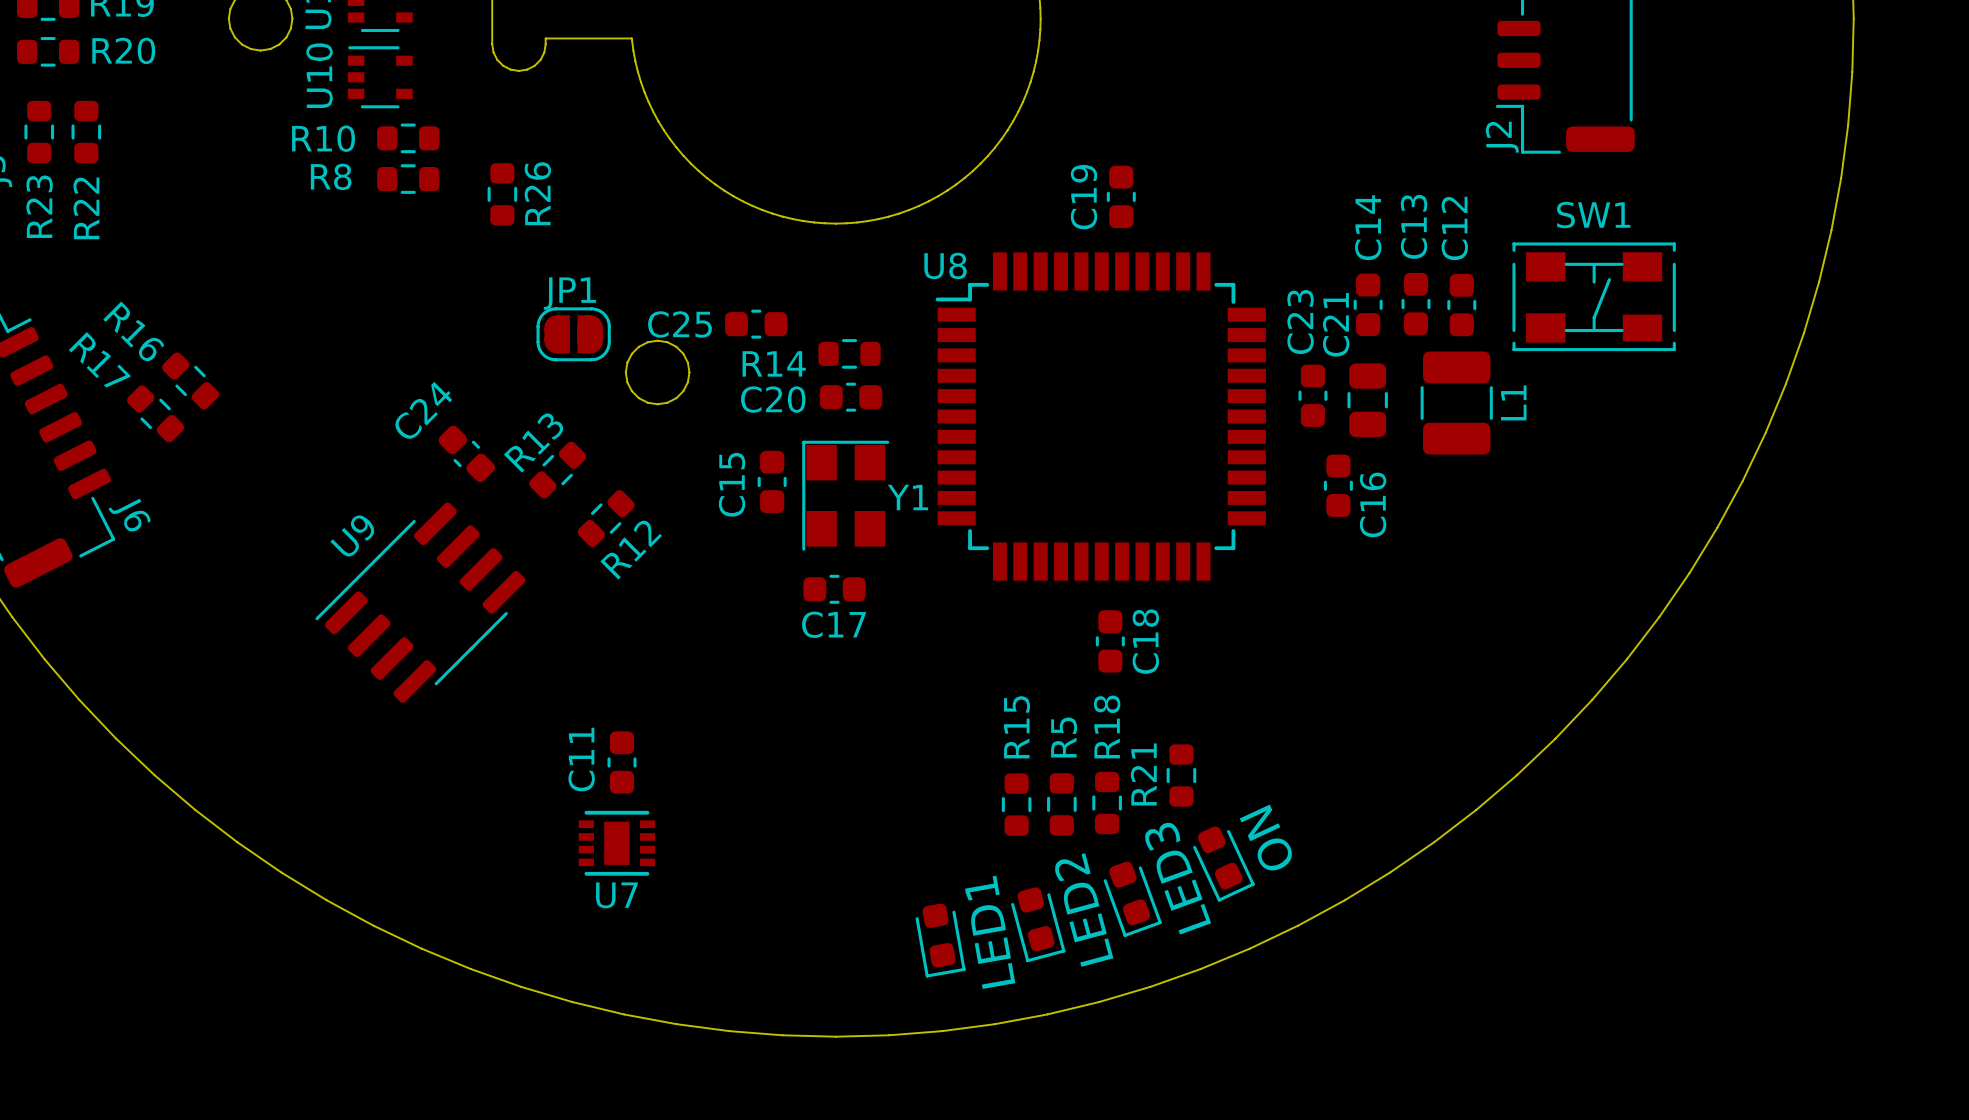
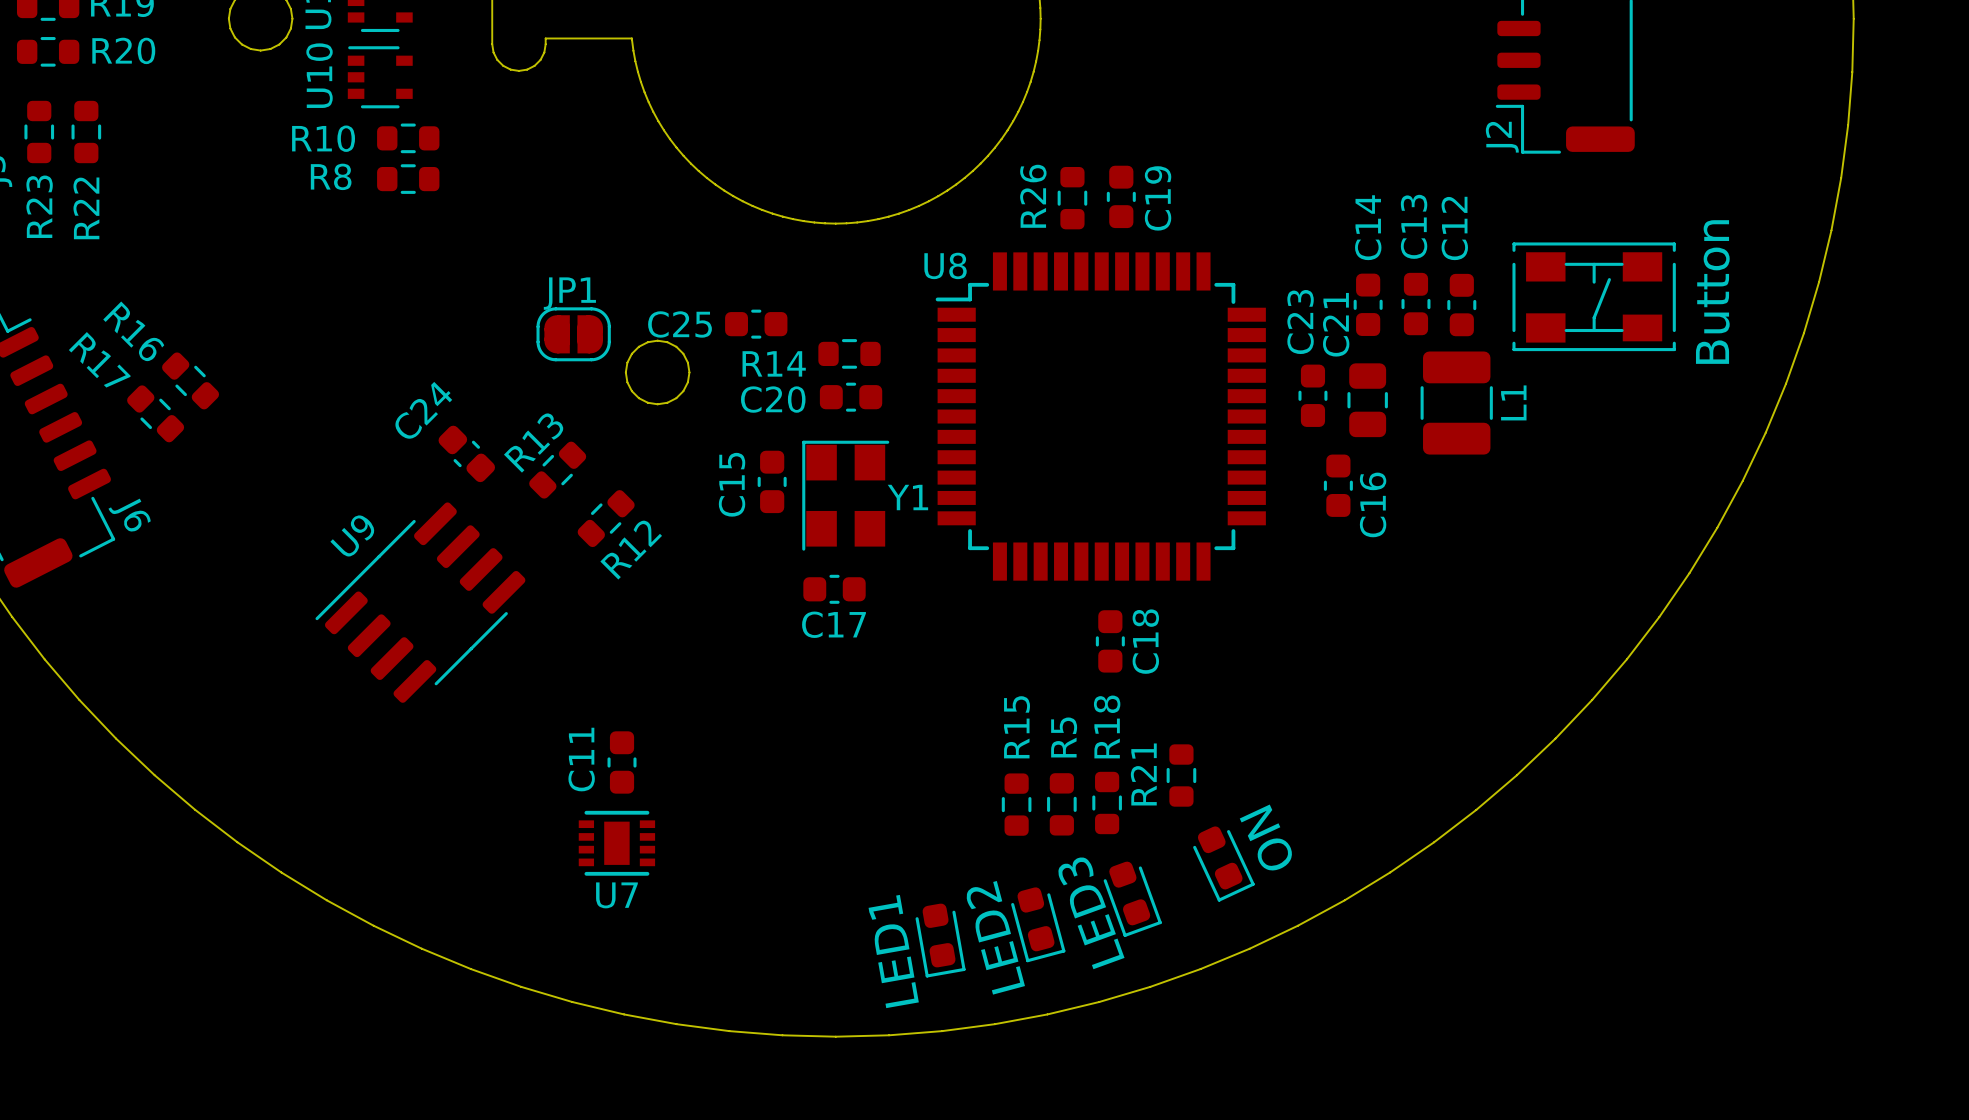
R26 name position: R26 (537, 193) -> R26 (1033, 196)
R26 position: (502, 194) -> (1072, 198)
C19 name position: C19 (1083, 197) -> C19 (1158, 198)
SW1 name: SW1 (1593, 215) -> none
text: none -> Button (1712, 292)
text: LED3 (1177, 878) -> none
text: LED2 (1083, 910) -> LED3 (1091, 912)
text: LED1 (990, 932) -> LED2 (995, 937)
text: none -> LED1 (893, 951)

